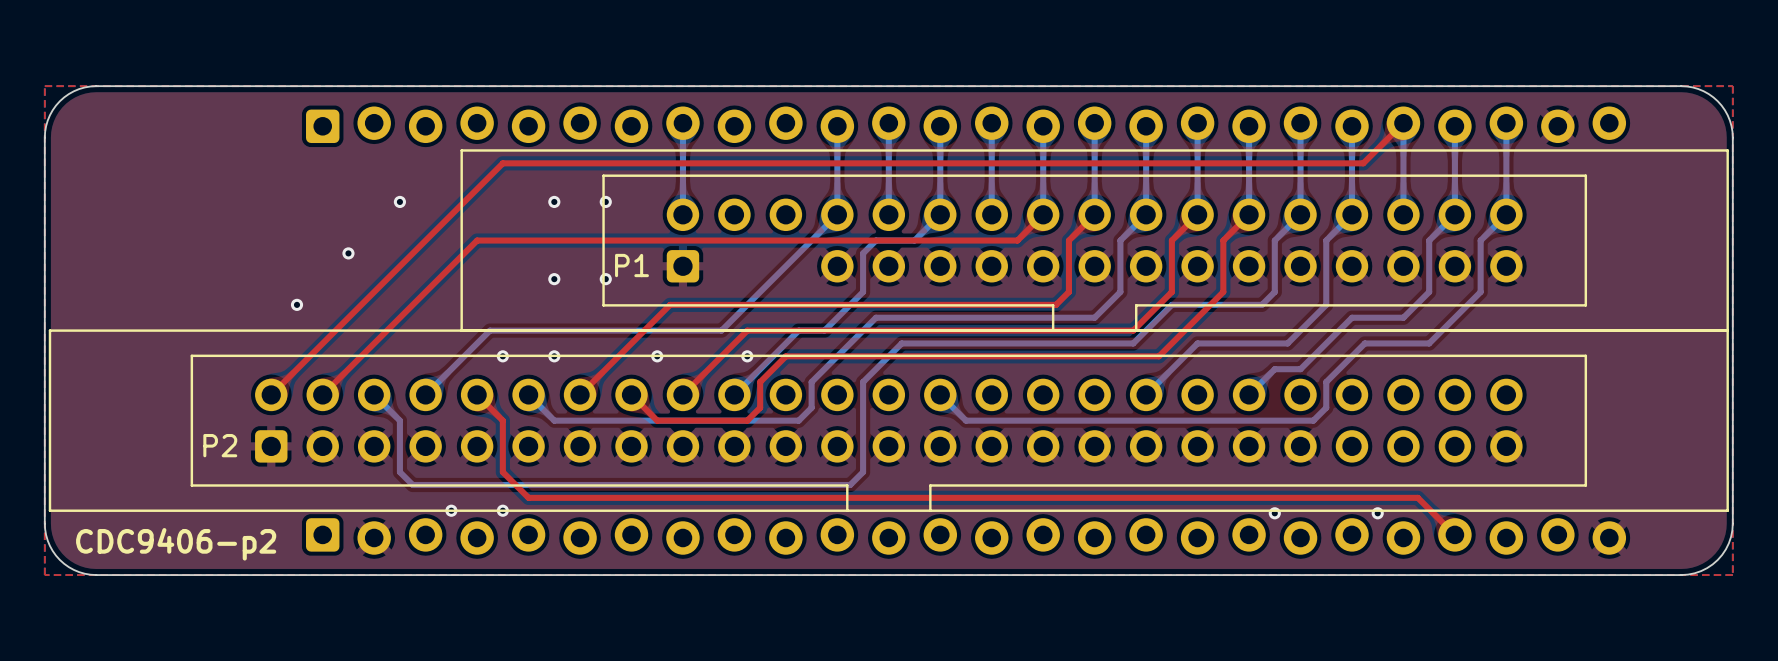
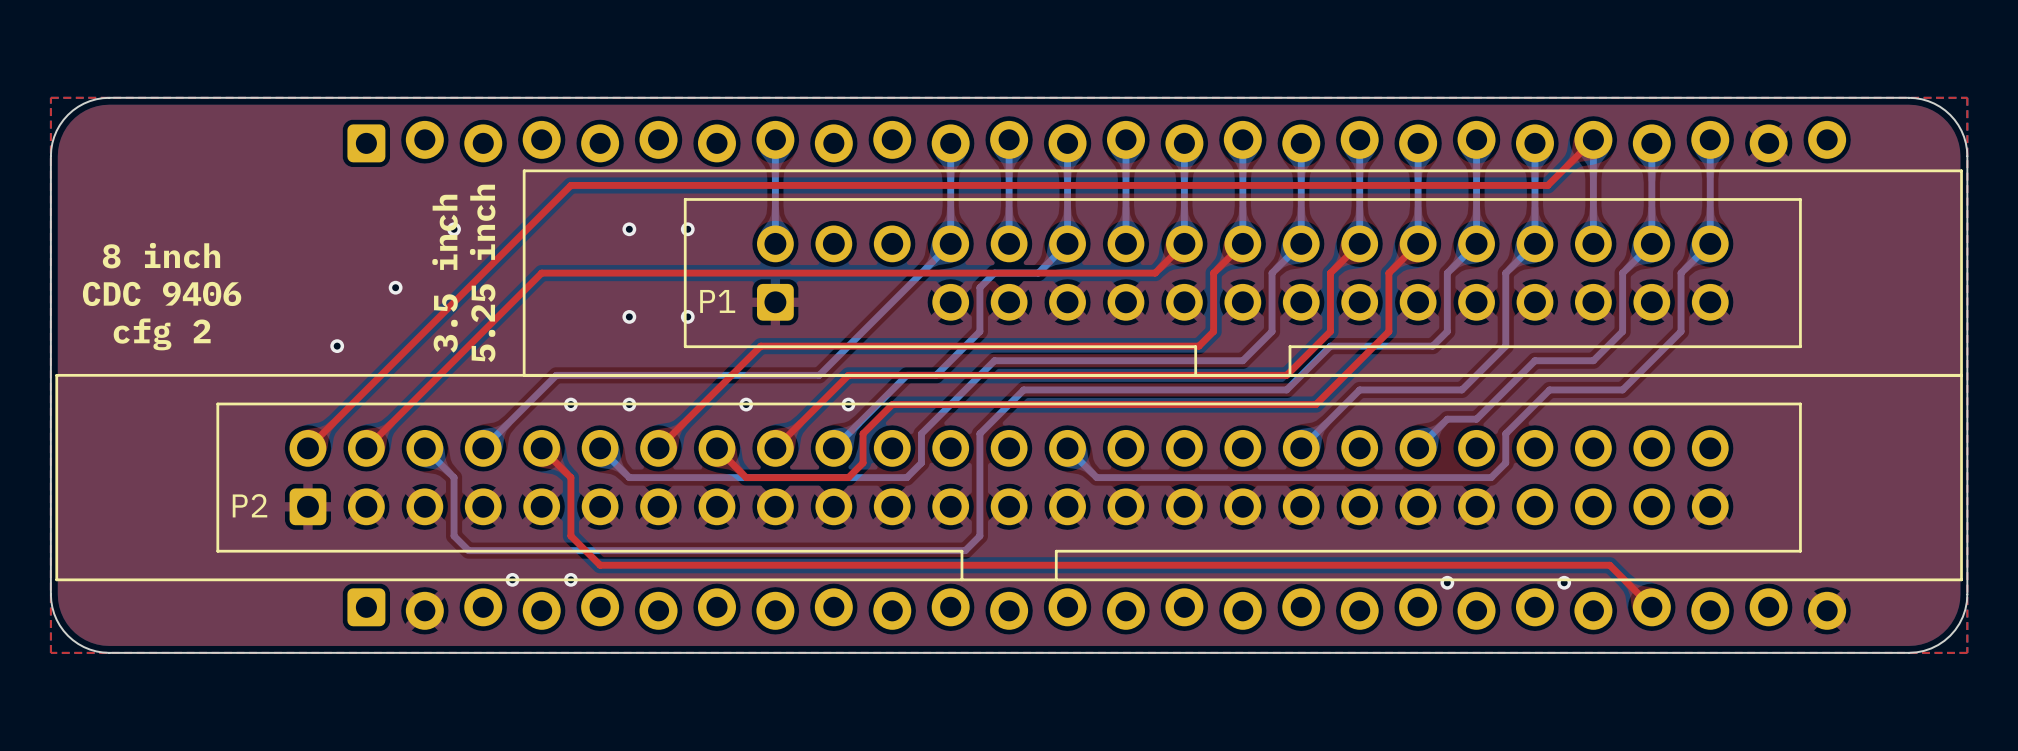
text: none -> 8 inch (161, 255)
text: none -> 3.5 inch (445, 273)
text: none -> 5.25 inch (482, 273)
text: none -> CDC 9406 (162, 293)
text: none -> cfg 2 (162, 334)
text: CDC9406-p2 (176, 544) -> none

